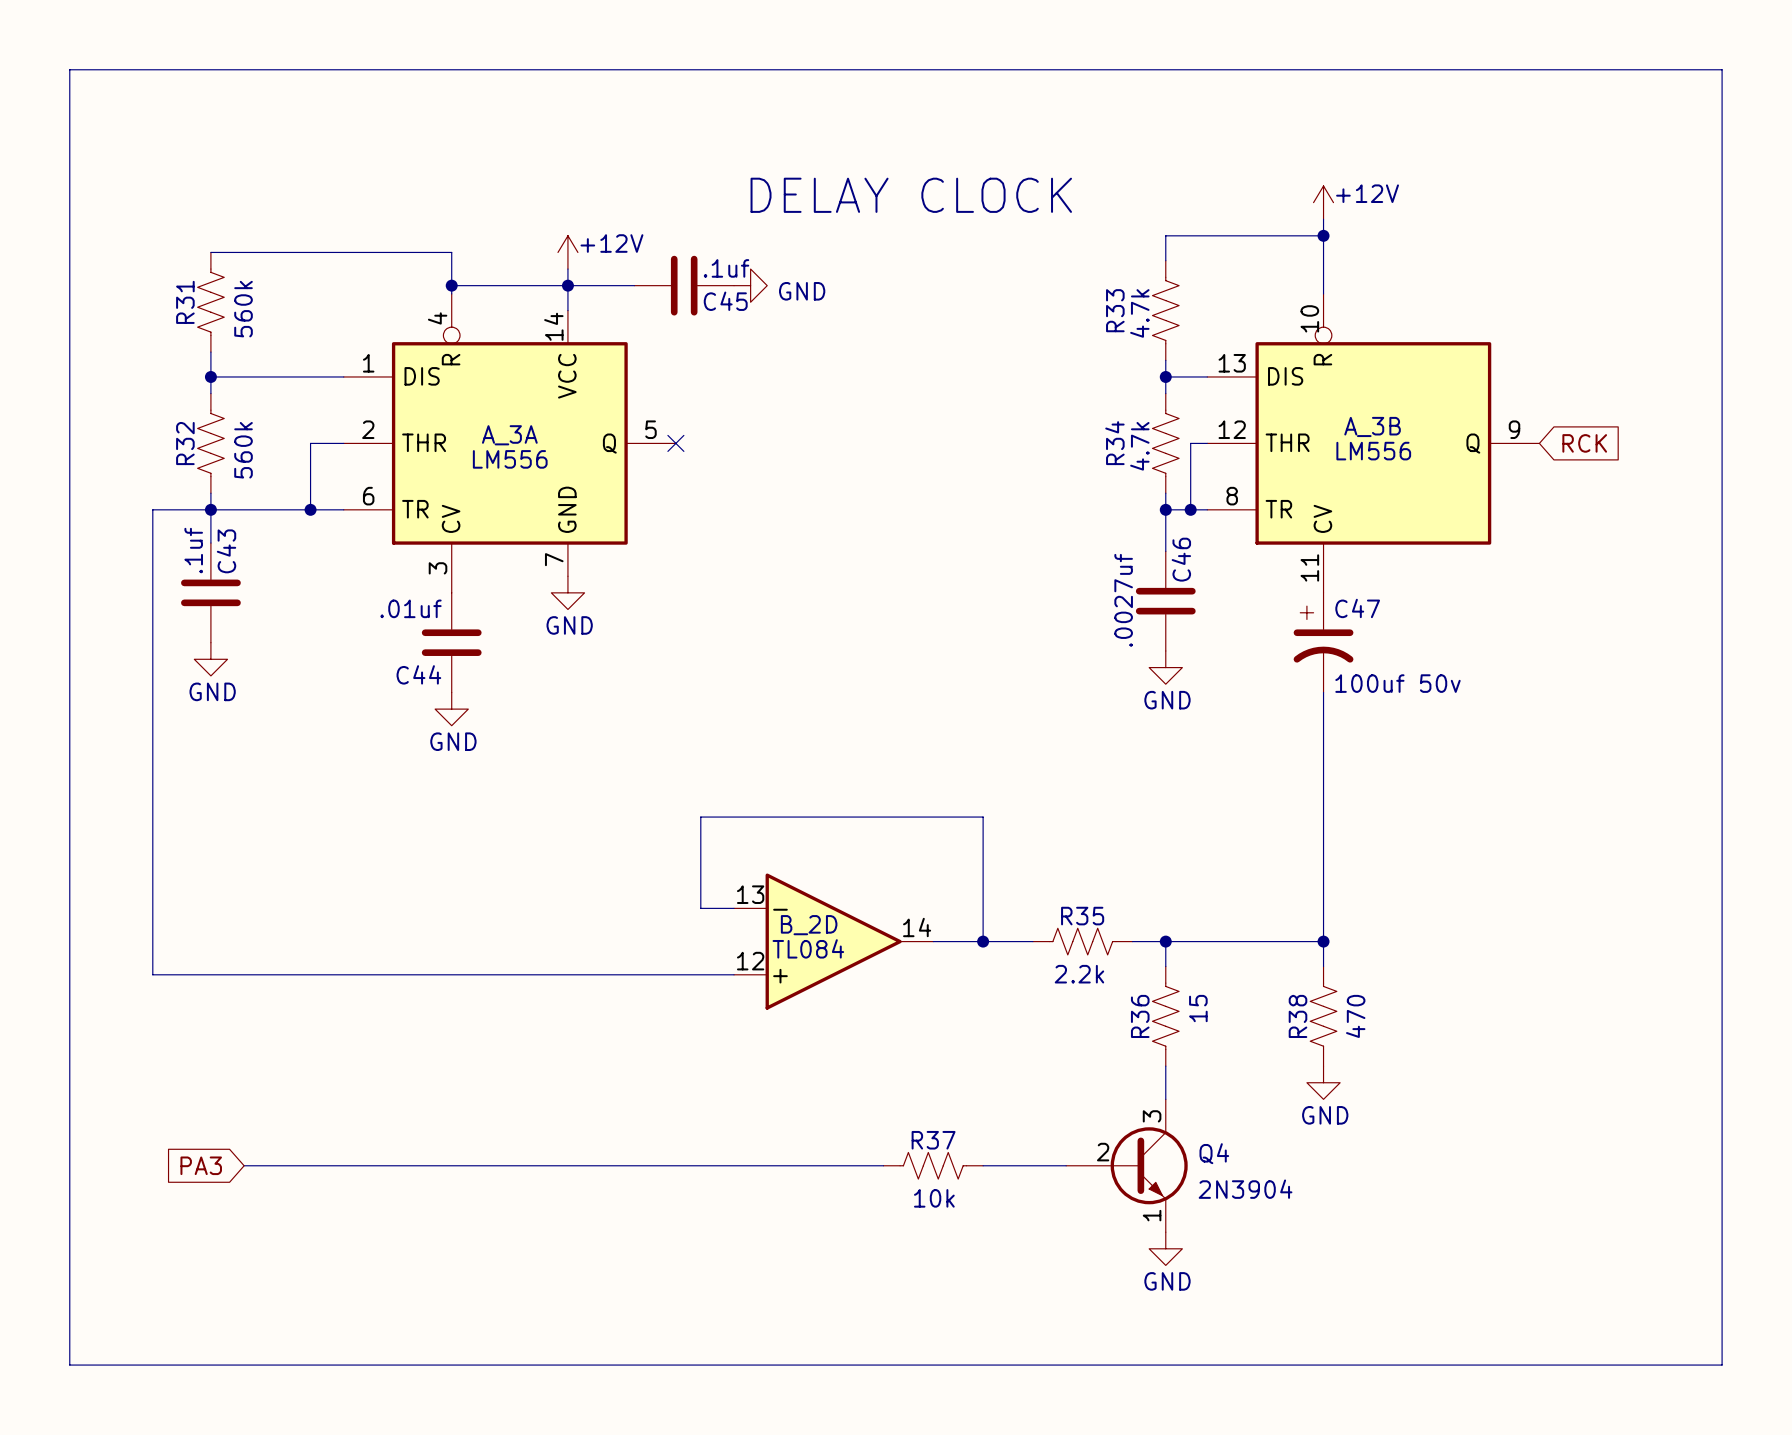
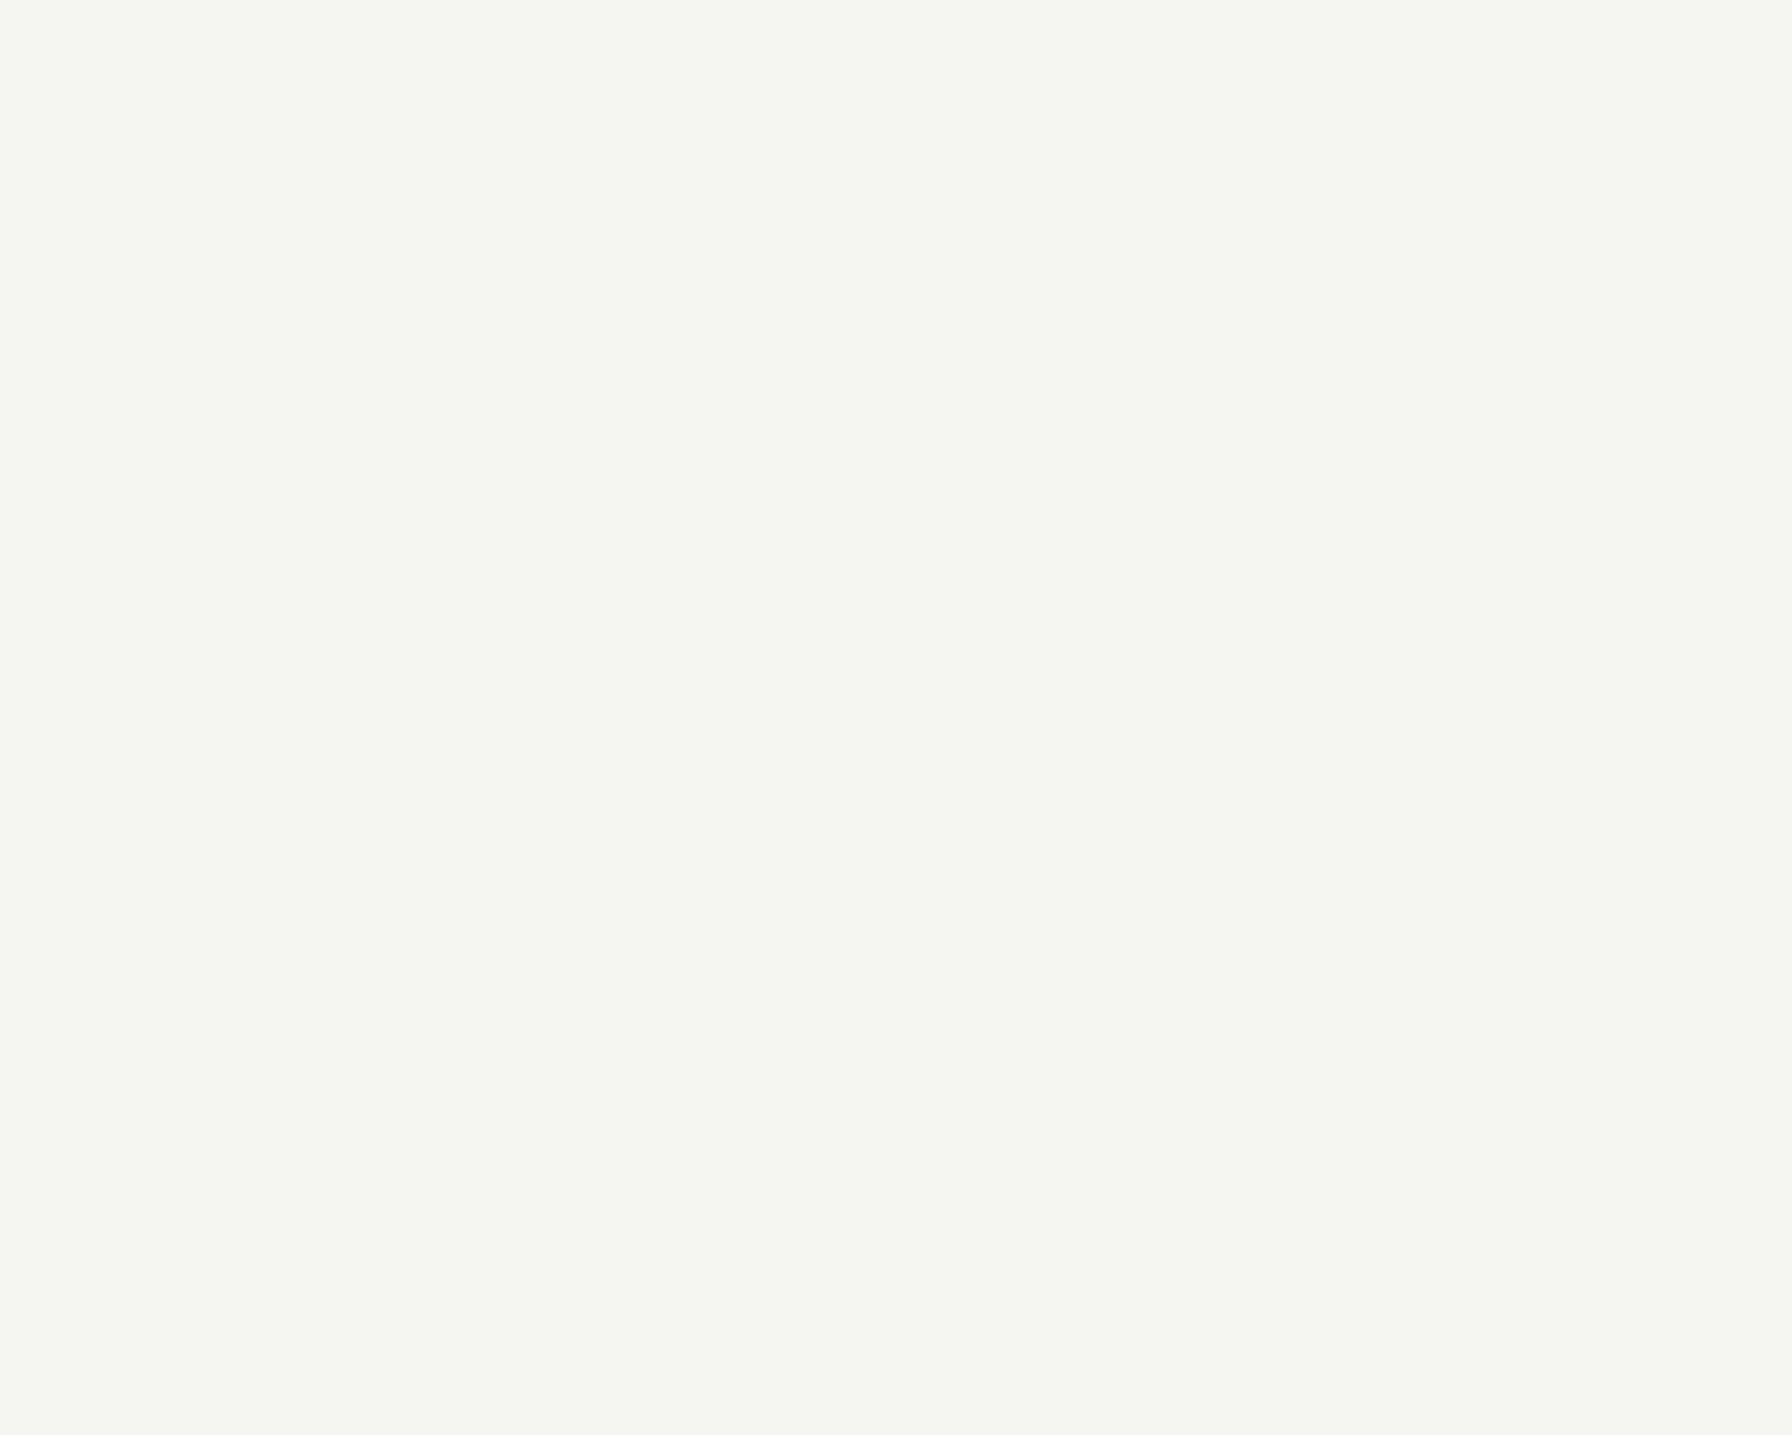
line: (69, 69) (1722, 69) (1722, 1365) (69, 1365) (69, 69) -> none
text: DELAY CLOCK (911, 195) -> none
power symbol: +12V (1323, 202) -> none
wire: (1323, 219) (1323, 293) -> none
wire: (1323, 235) (1165, 235) (1165, 260) -> none
junction: (1323, 235) -> none
wire: (210, 252) (451, 252) (451, 293) -> none
power symbol: +12V (567, 252) -> none
wire: (567, 269) (567, 310) -> none
wire: (451, 285) (634, 285) -> none
junction: (451, 285) -> none
junction: (567, 285) -> none
C45: .1uf (684, 285) -> none
power symbol: GND (750, 285) -> none
R31: 560k (210, 302) -> none
R33: 4.7k (1165, 310) -> none
wire: (210, 352) (210, 393) -> none
wire: (1165, 360) (1165, 393) -> none
wire: (210, 376) (343, 376) -> none
junction: (210, 376) -> none
wire: (1165, 376) (1207, 376) -> none
junction: (1165, 376) -> none
R32: 560k (210, 443) -> none
wire: (343, 443) (310, 443) (310, 509) -> none
A_3A: LM556 (509, 443) -> none
no-connect mark: (675, 443) -> none
R34: 4.7k (1165, 443) -> none
wire: (1207, 443) (1190, 443) (1190, 509) -> none
A_3B: LM556 (1373, 443) -> none
global label: RCK (1584, 443) -> none
wire: (210, 493) (210, 543) -> none
wire: (1165, 493) (1165, 551) -> none
junction: (210, 509) -> none
junction: (310, 509) -> none
wire: (343, 509) (152, 509) (152, 974) (734, 974) -> none
wire: (1165, 509) (1207, 509) -> none
junction: (1165, 509) -> none
junction: (1190, 509) -> none
C43: .1uf (210, 592) -> none
power symbol: GND (567, 592) -> none
C46: .0027uf (1165, 601) -> none
C44: .01uf (451, 642) -> none
C47: 100uf 50v (1323, 642) -> none
power symbol: GND (210, 659) -> none
power symbol: GND (1165, 667) -> none
wire: (1323, 692) (1323, 966) -> none
power symbol: GND (451, 709) -> none
wire: (734, 908) (700, 908) (700, 817) (983, 817) (983, 941) -> none
B_2D: TL084 (833, 941) -> none
wire: (933, 941) (1032, 941) -> none
junction: (983, 941) -> none
R35: 2.2k (1082, 941) -> none
wire: (1132, 941) (1323, 941) -> none
wire: (1165, 941) (1165, 966) -> none
junction: (1165, 941) -> none
junction: (1323, 941) -> none
R36: 15 (1165, 1016) -> none
R38: 470 (1323, 1016) -> none
wire: (1165, 1066) (1165, 1099) -> none
power symbol: GND (1323, 1082) -> none
global label: PA3 (201, 1165) -> none
wire: (244, 1165) (883, 1165) -> none
R37: 10k (933, 1165) -> none
wire: (983, 1165) (1066, 1165) -> none
Q4: 2N3904 (1126, 1165) -> none
power symbol: GND (1165, 1248) -> none

